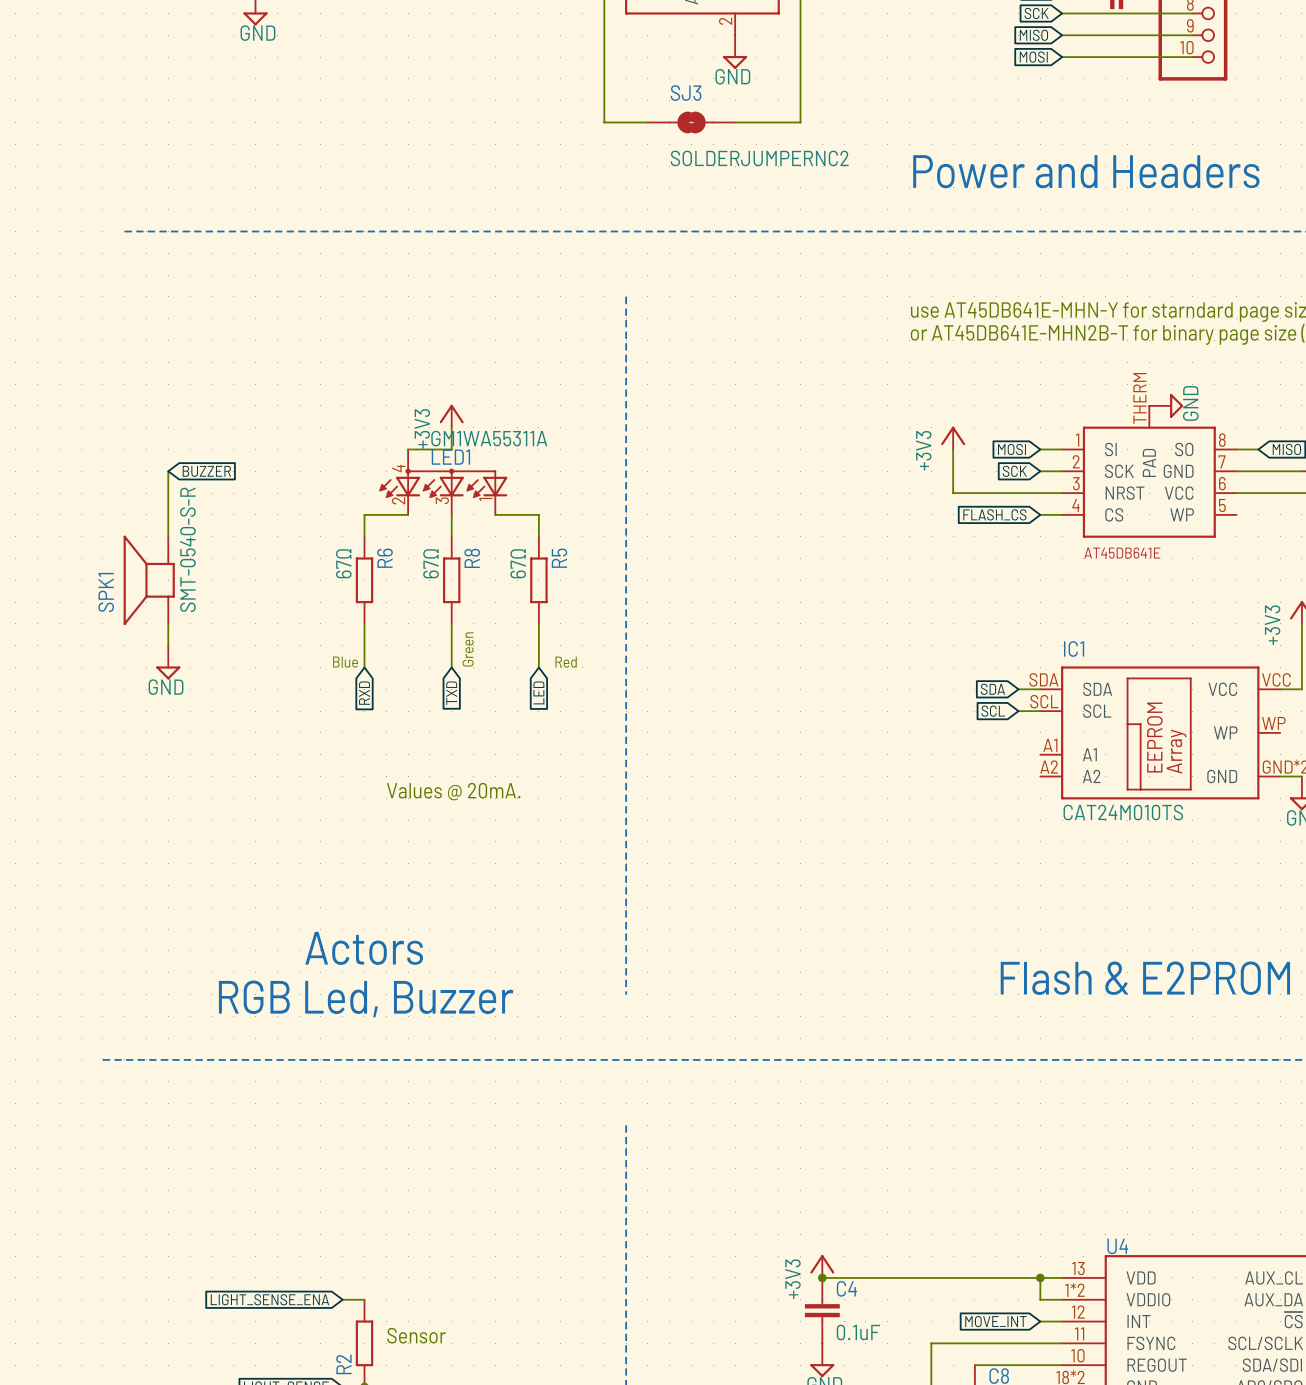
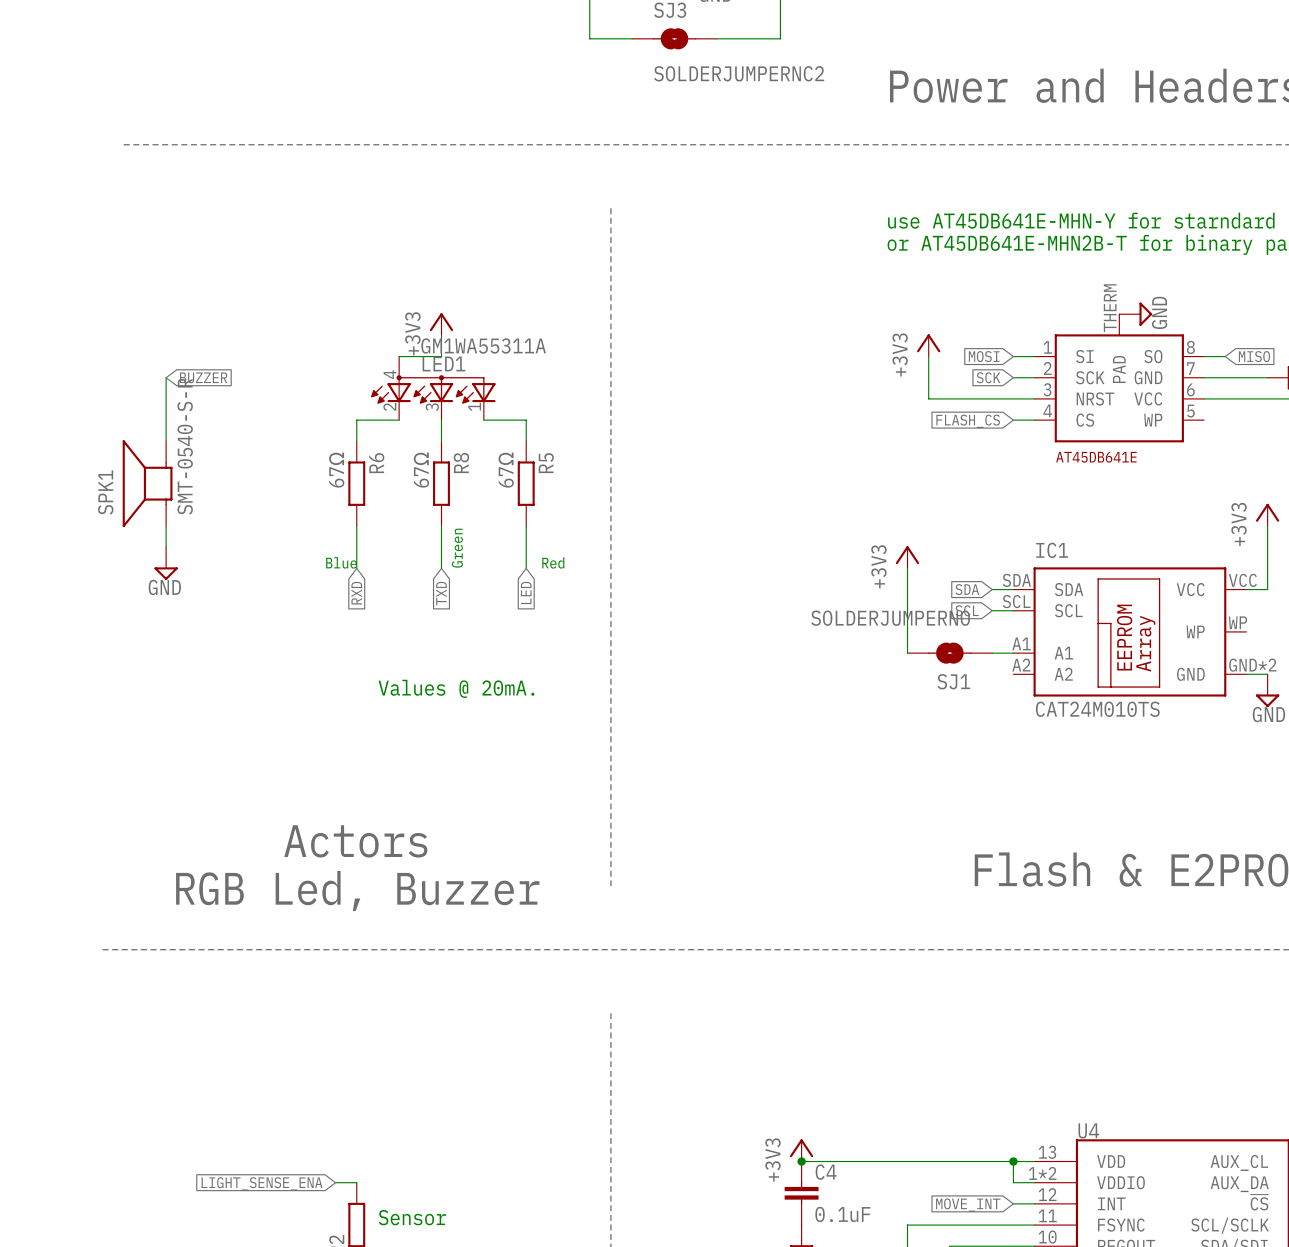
power symbol: none -> +3V3 (907, 557)
wire: none -> (907, 568) (907, 653)
SJ1: none -> SOLDERJUMPERNO (949, 653)
wire: none -> (992, 653) (1013, 653)

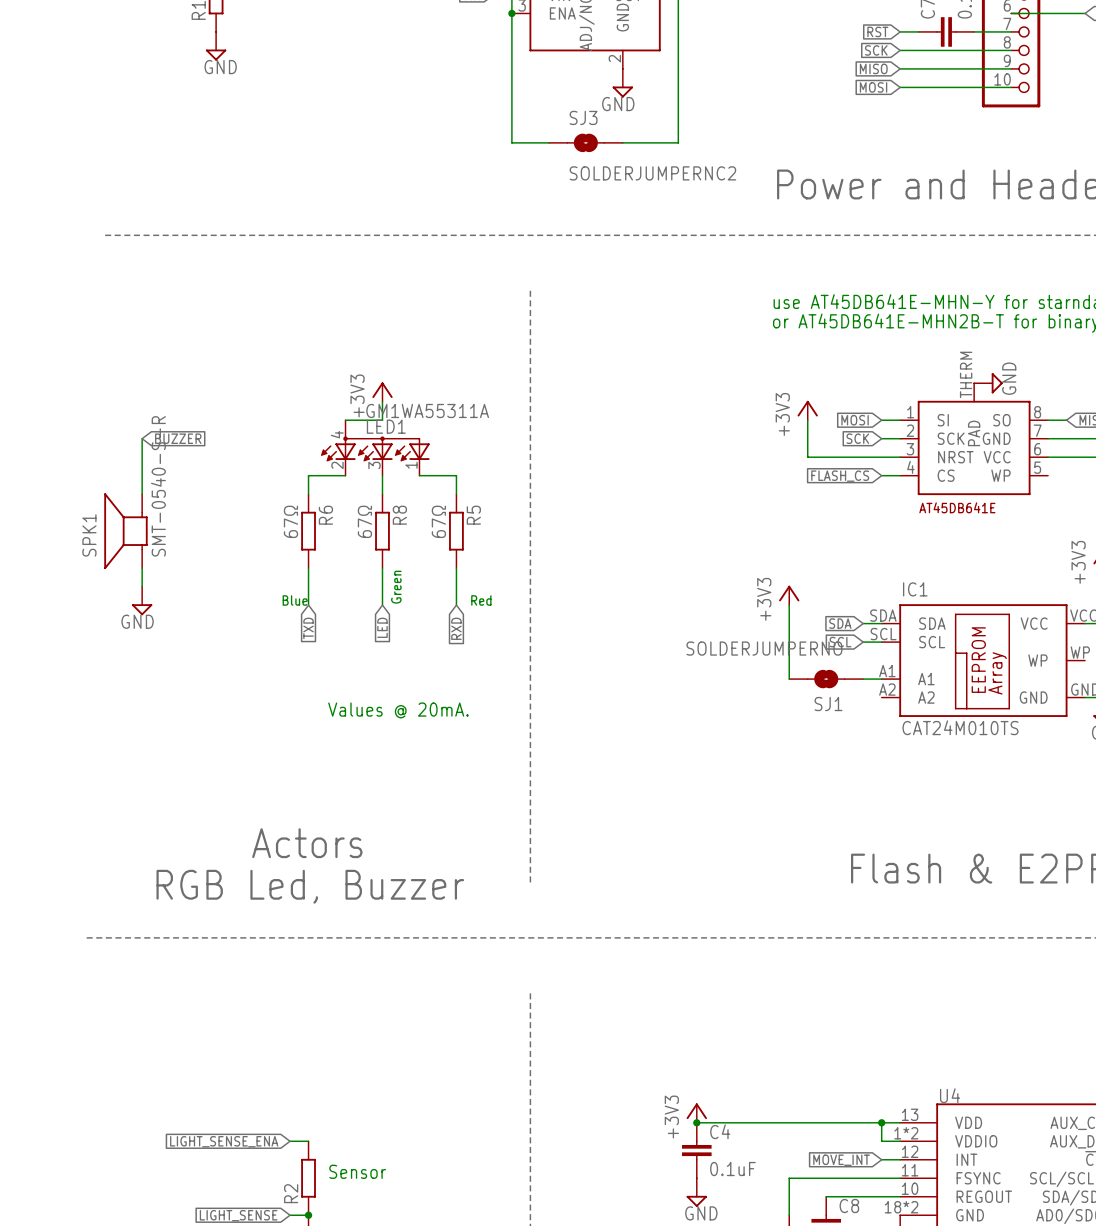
global label: LED (526, 592) -> RXD (456, 628)
global label: RXD (356, 593) -> TXD (308, 628)
global label: TXD (441, 593) -> LED (382, 627)

